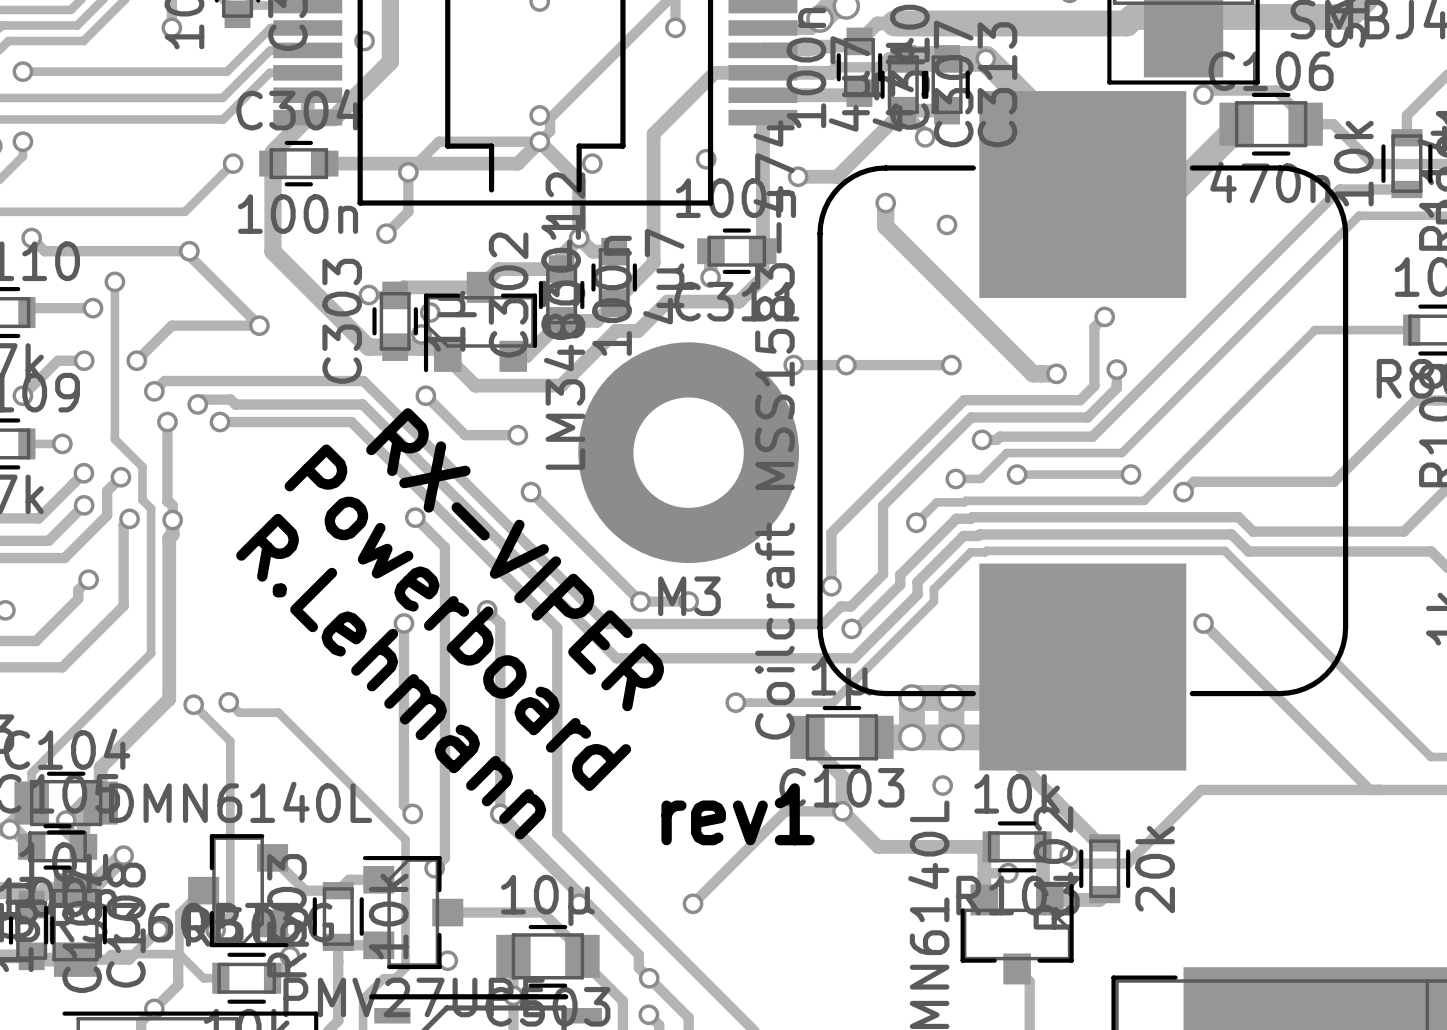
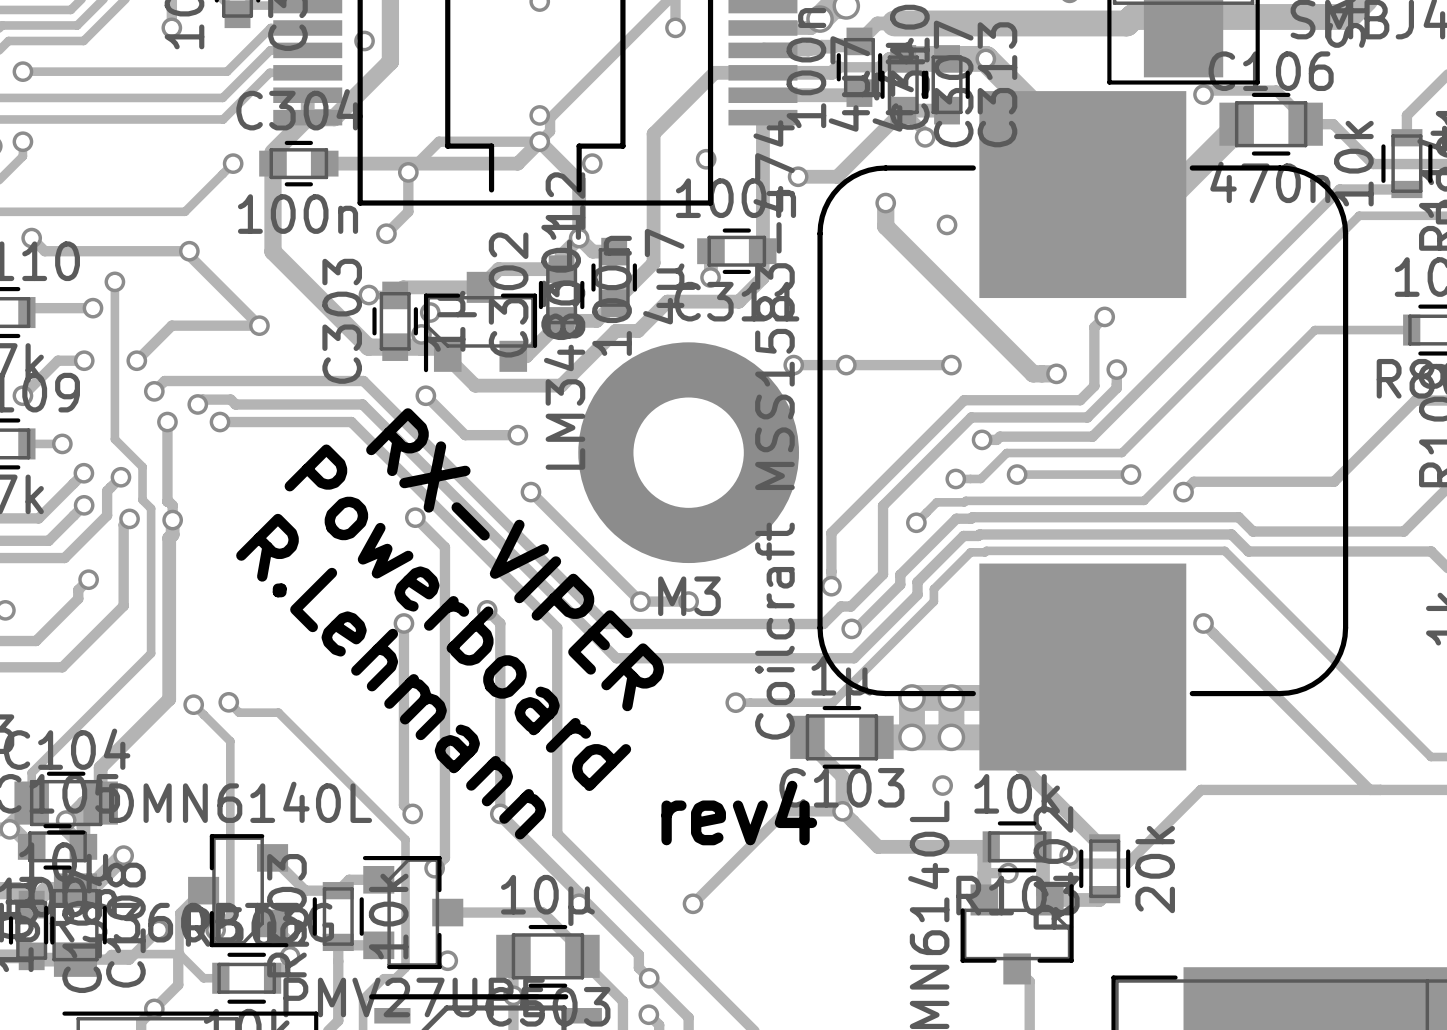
text: rev1 (738, 814) -> rev4 (739, 813)

